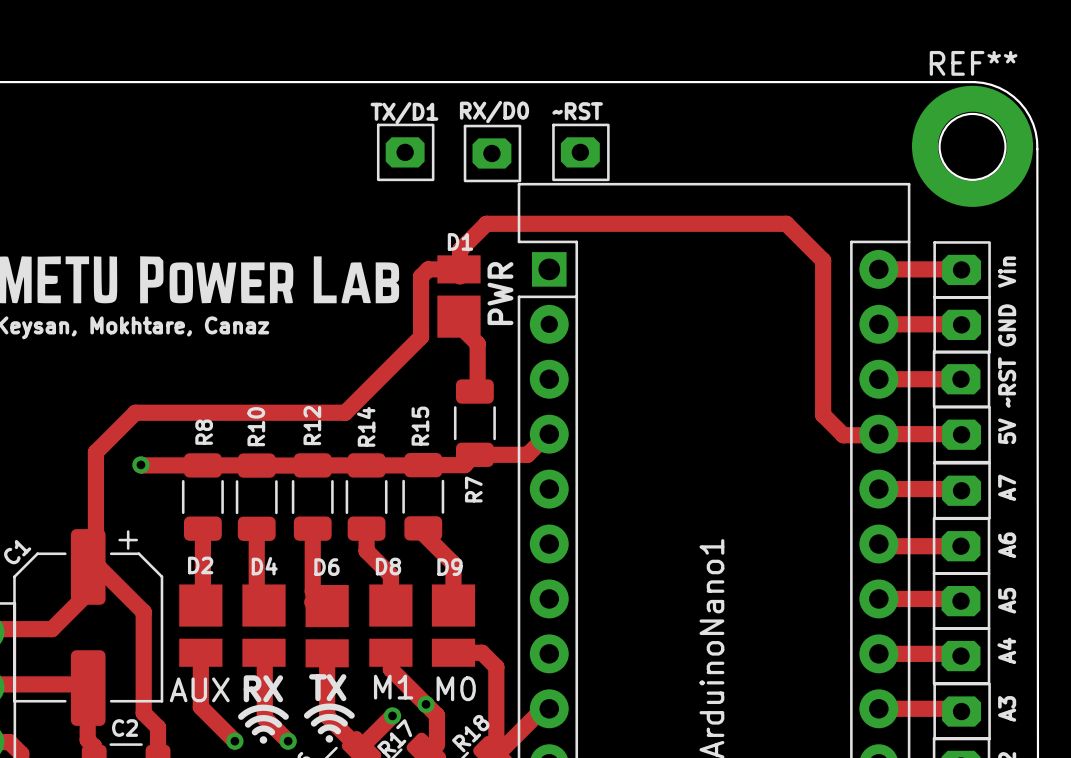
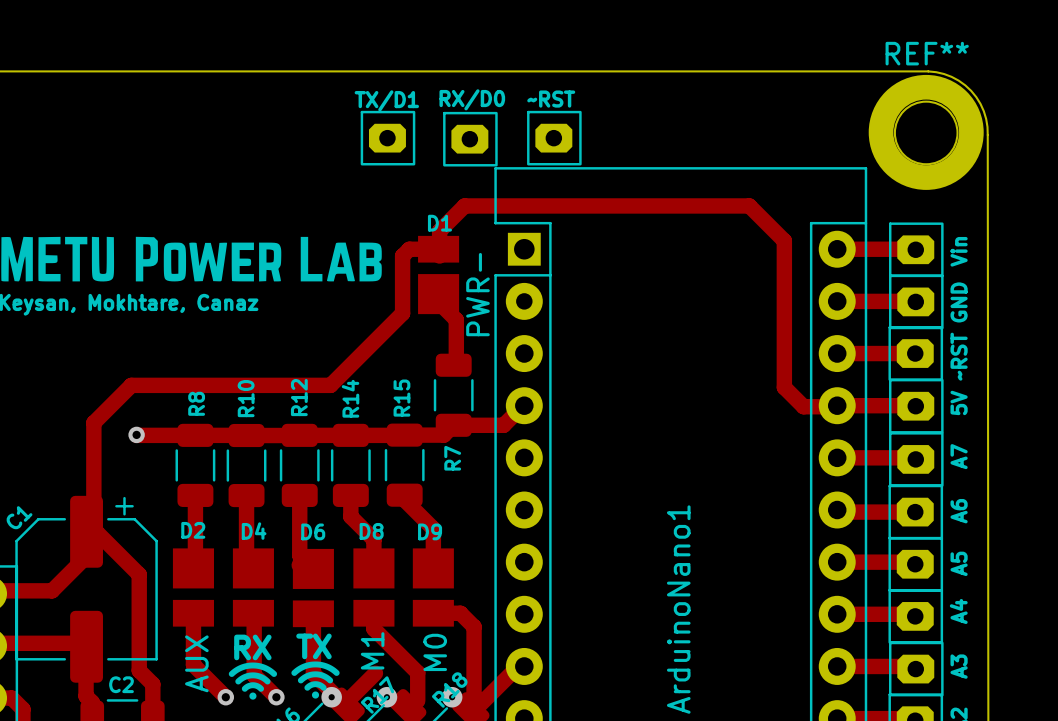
text: PWR (500, 293) -> PWR- (477, 294)
text rotation: 0° (393, 687) -> 90° counterclockwise (372, 650)
text rotation: 0° (456, 688) -> 90° counterclockwise (435, 652)
text rotation: 0° (199, 689) -> 90° counterclockwise (196, 663)
via: (426, 704) -> none
via: (392, 715) -> none
via: none -> (331, 697)
via: none -> (386, 697)
via: none -> (452, 697)

